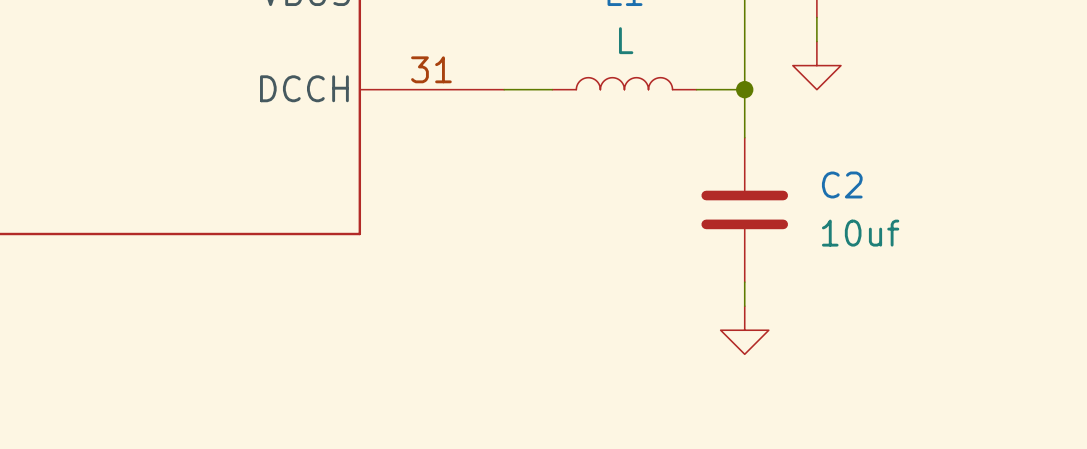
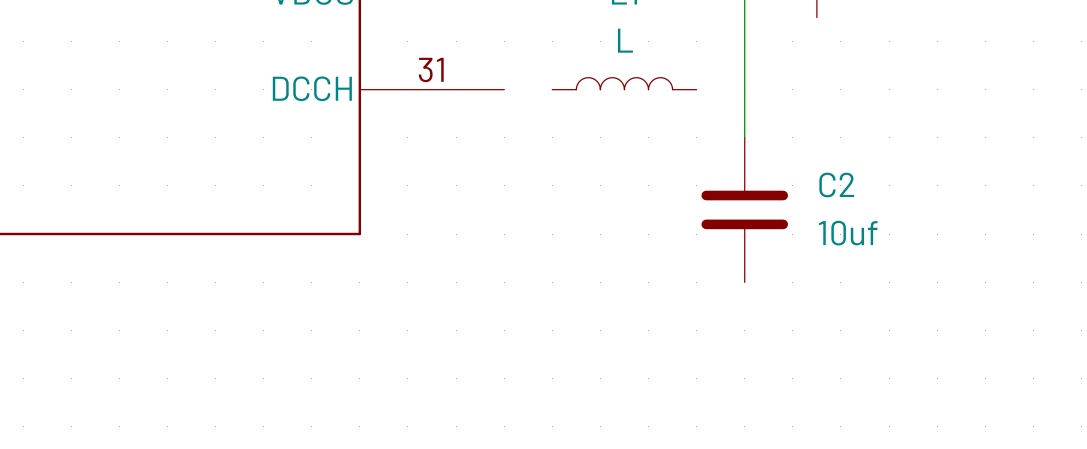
wire: (816, 17) (816, 41) -> none
power symbol: (816, 65) -> none
wire: (504, 89) (552, 89) -> none
wire: (696, 89) (744, 89) -> none
junction: (744, 89) -> none
wire: (744, 282) (744, 306) -> none
power symbol: (744, 330) -> none

